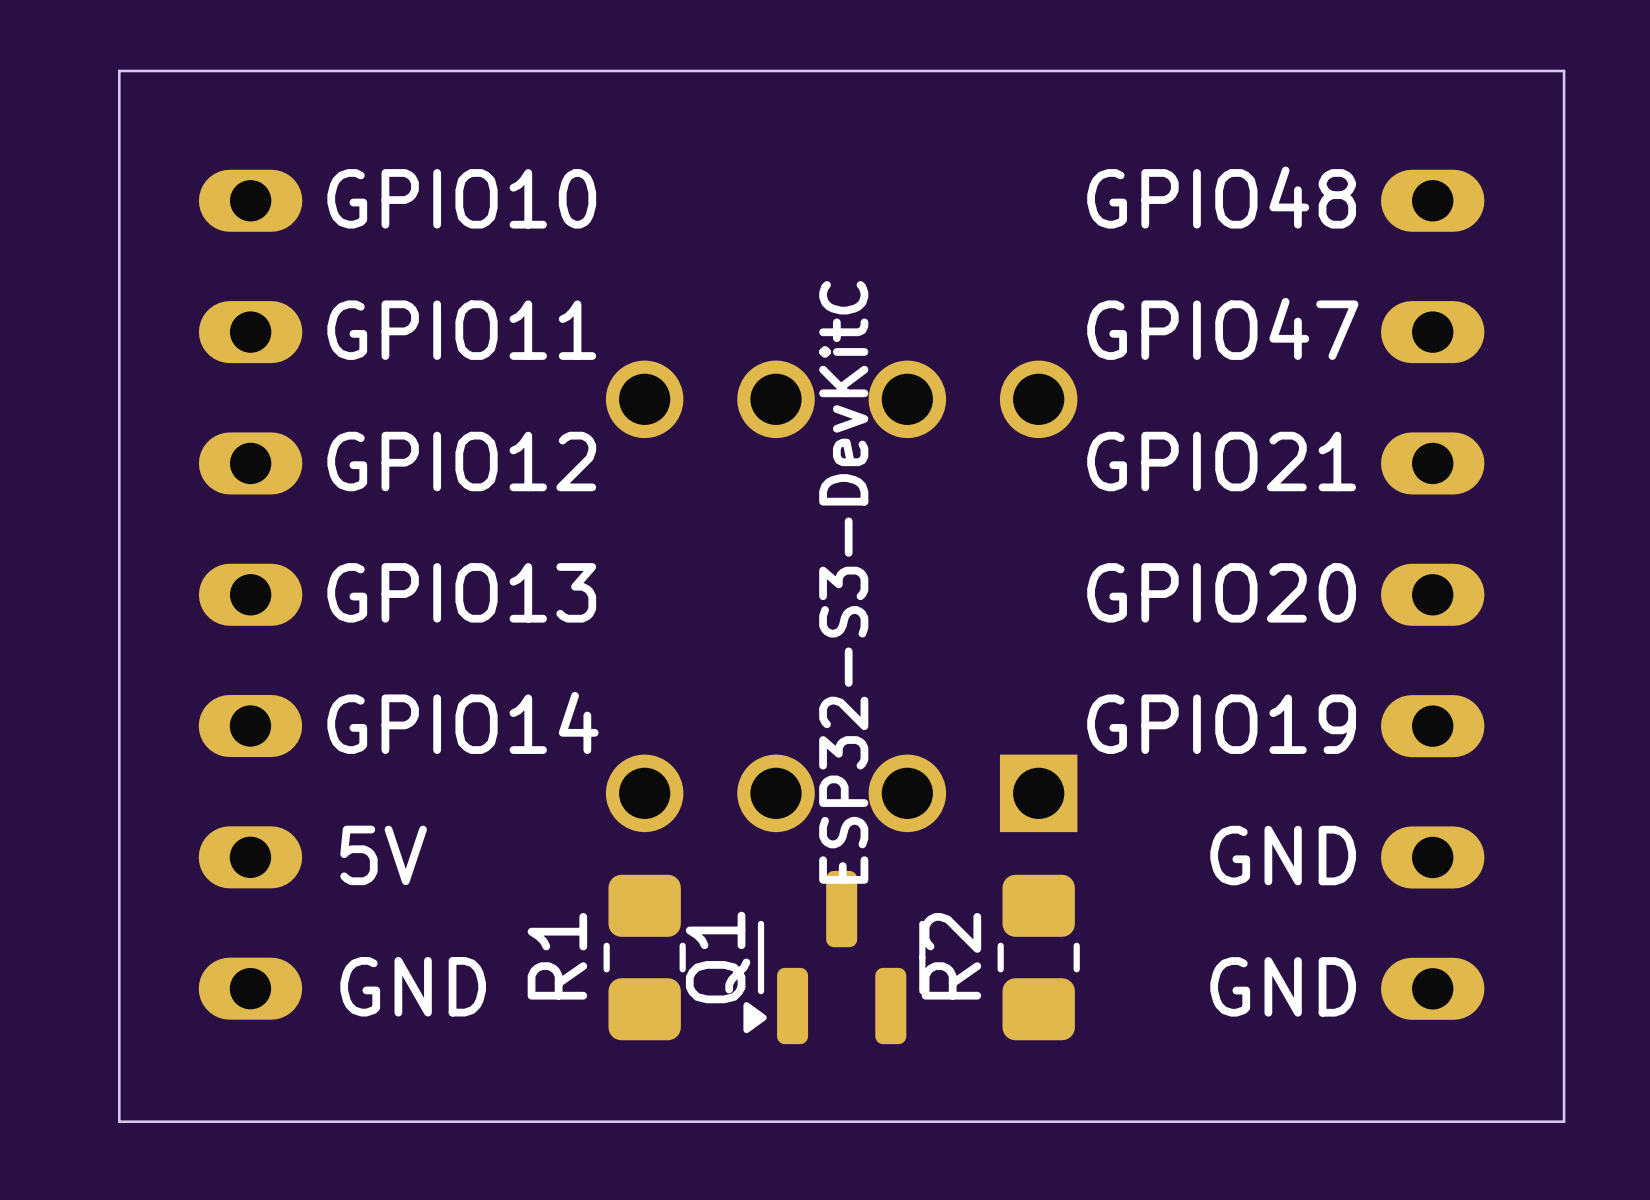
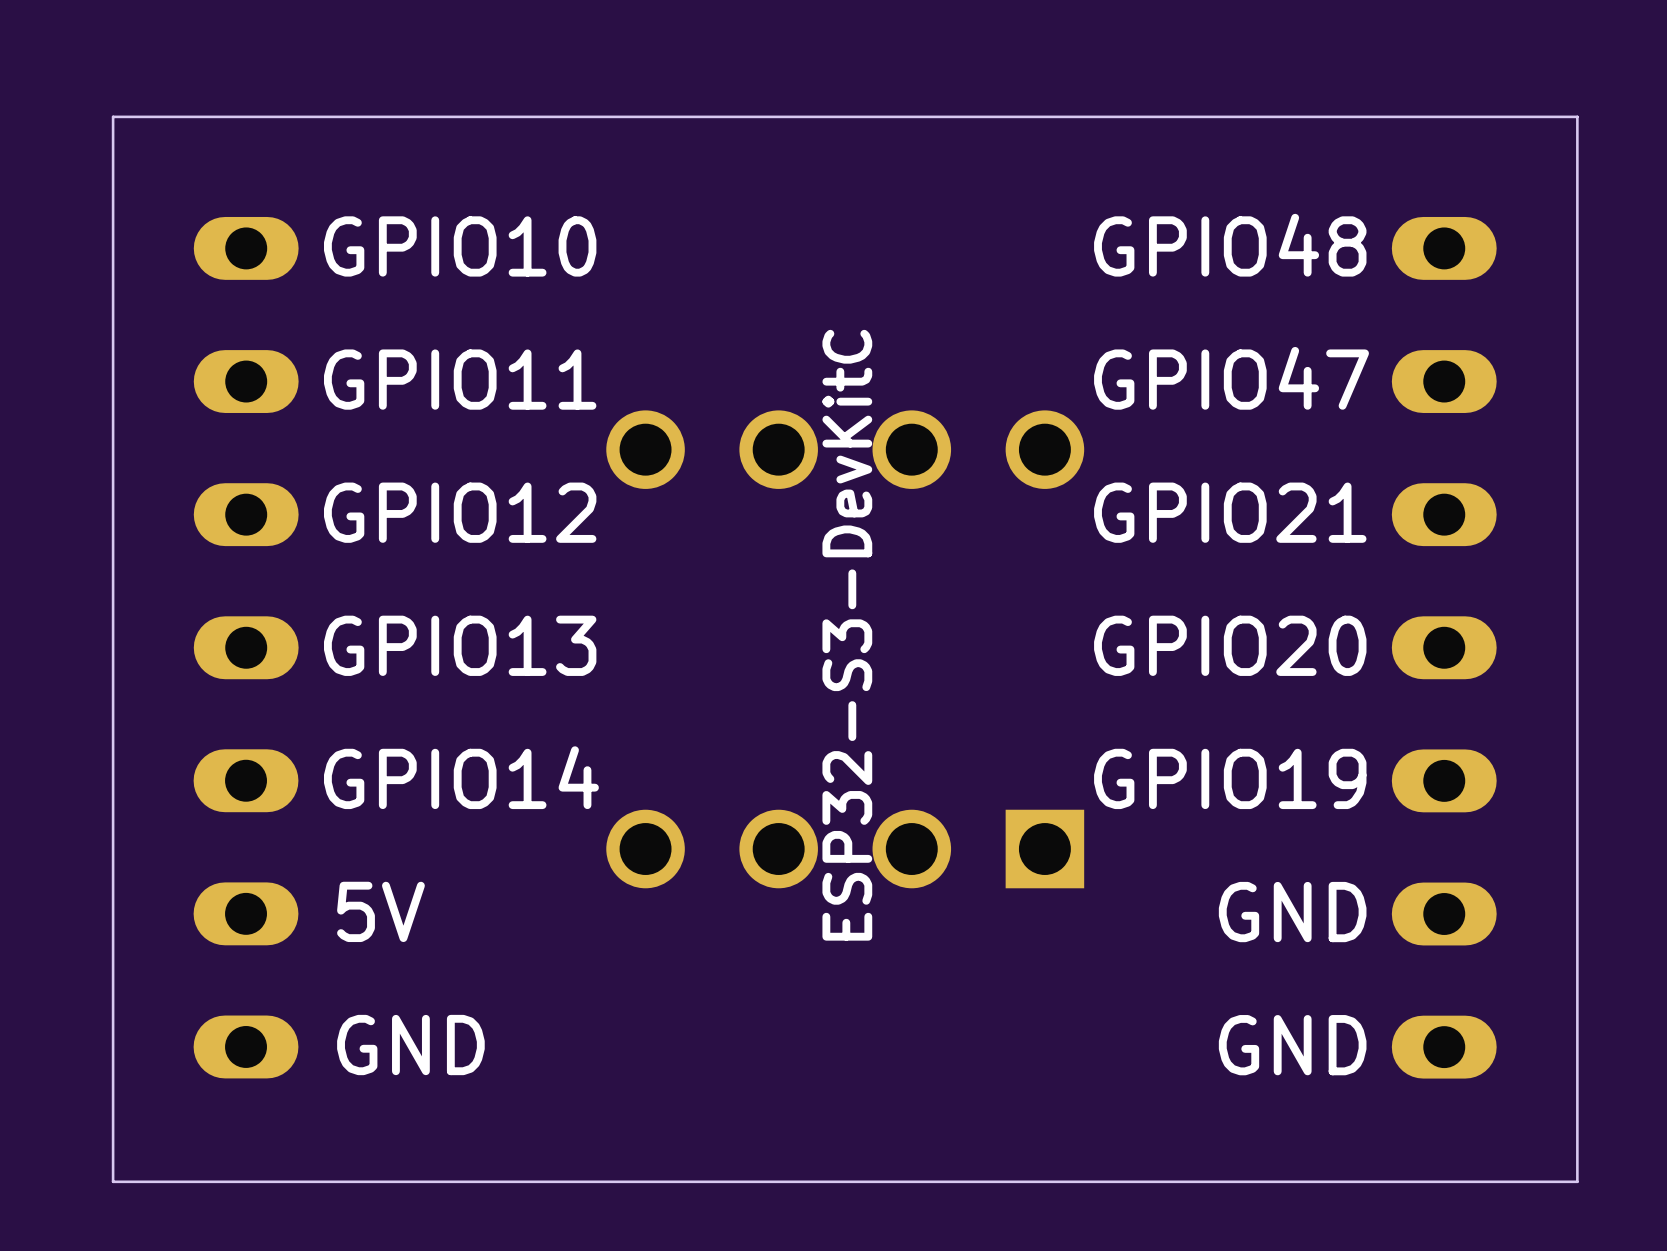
R1: (644, 957) -> none
Q1: (834, 957) -> none
R2: (1038, 957) -> none

